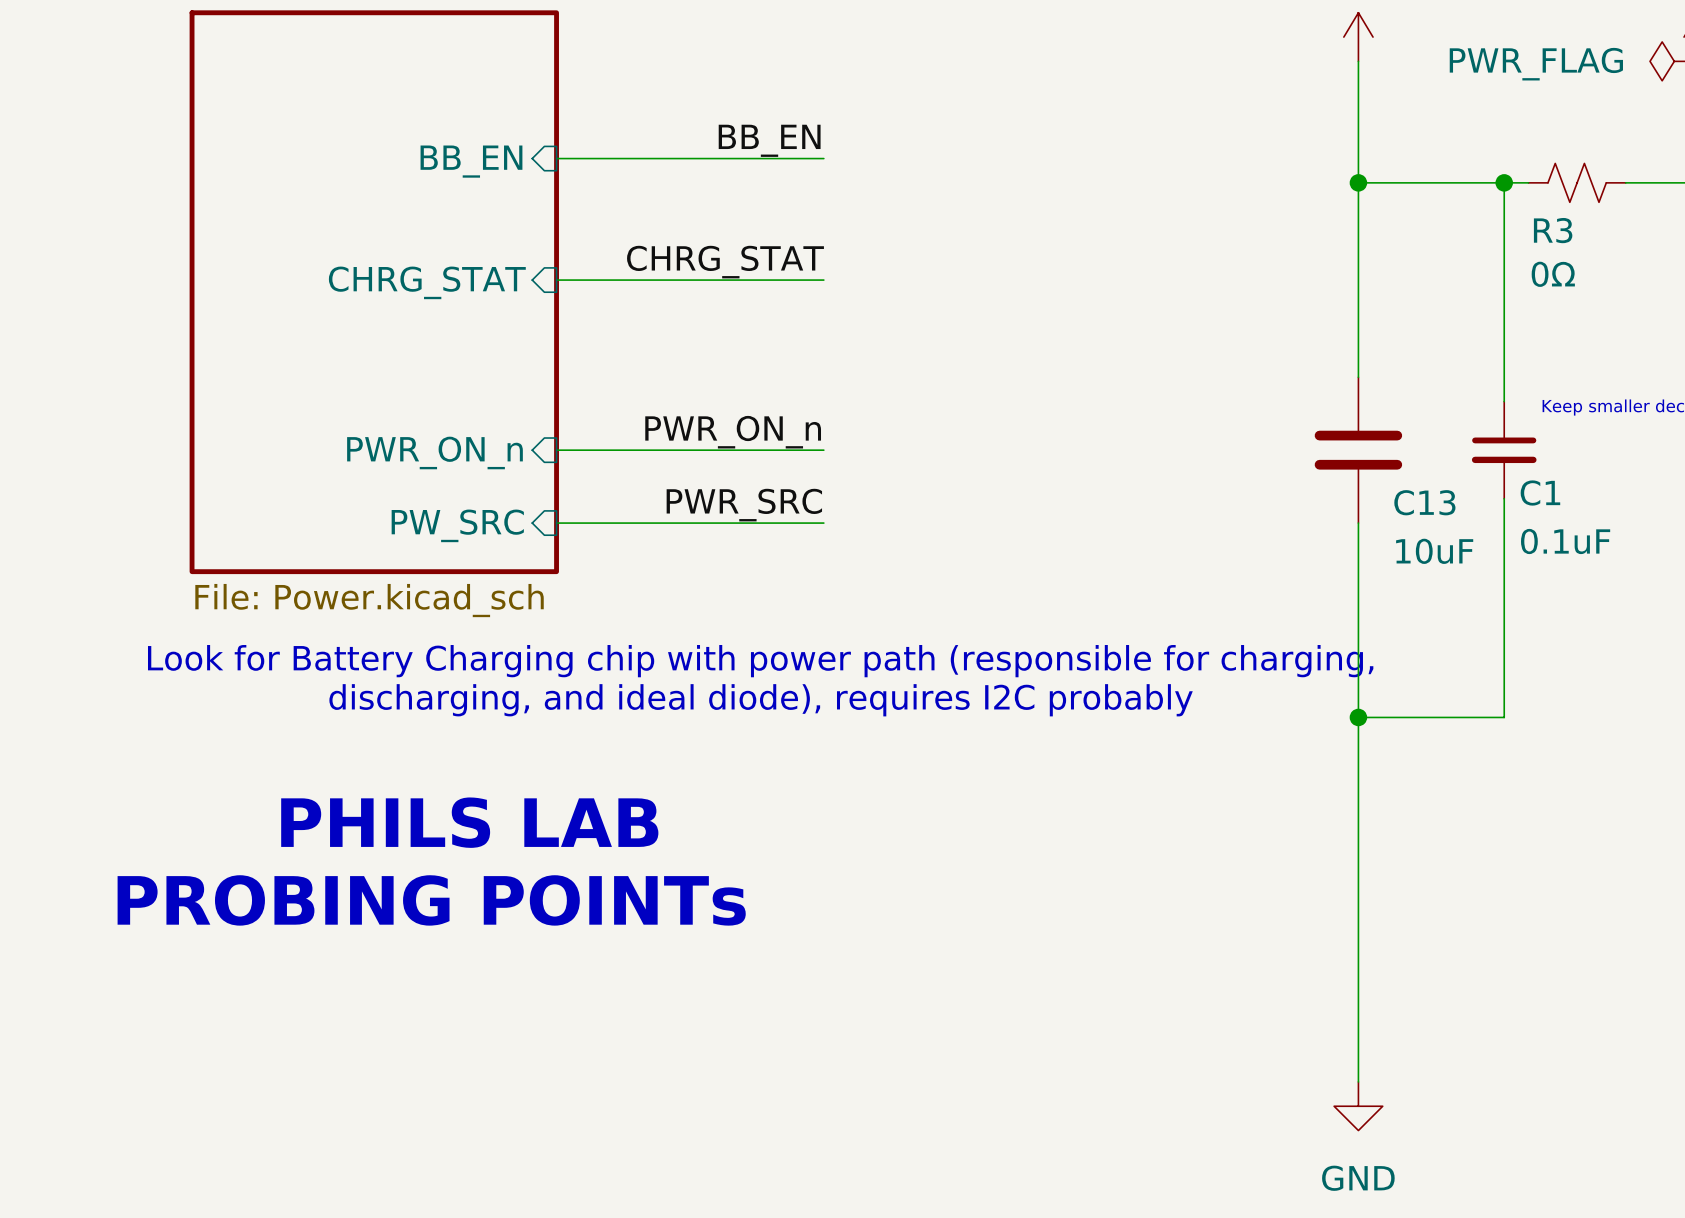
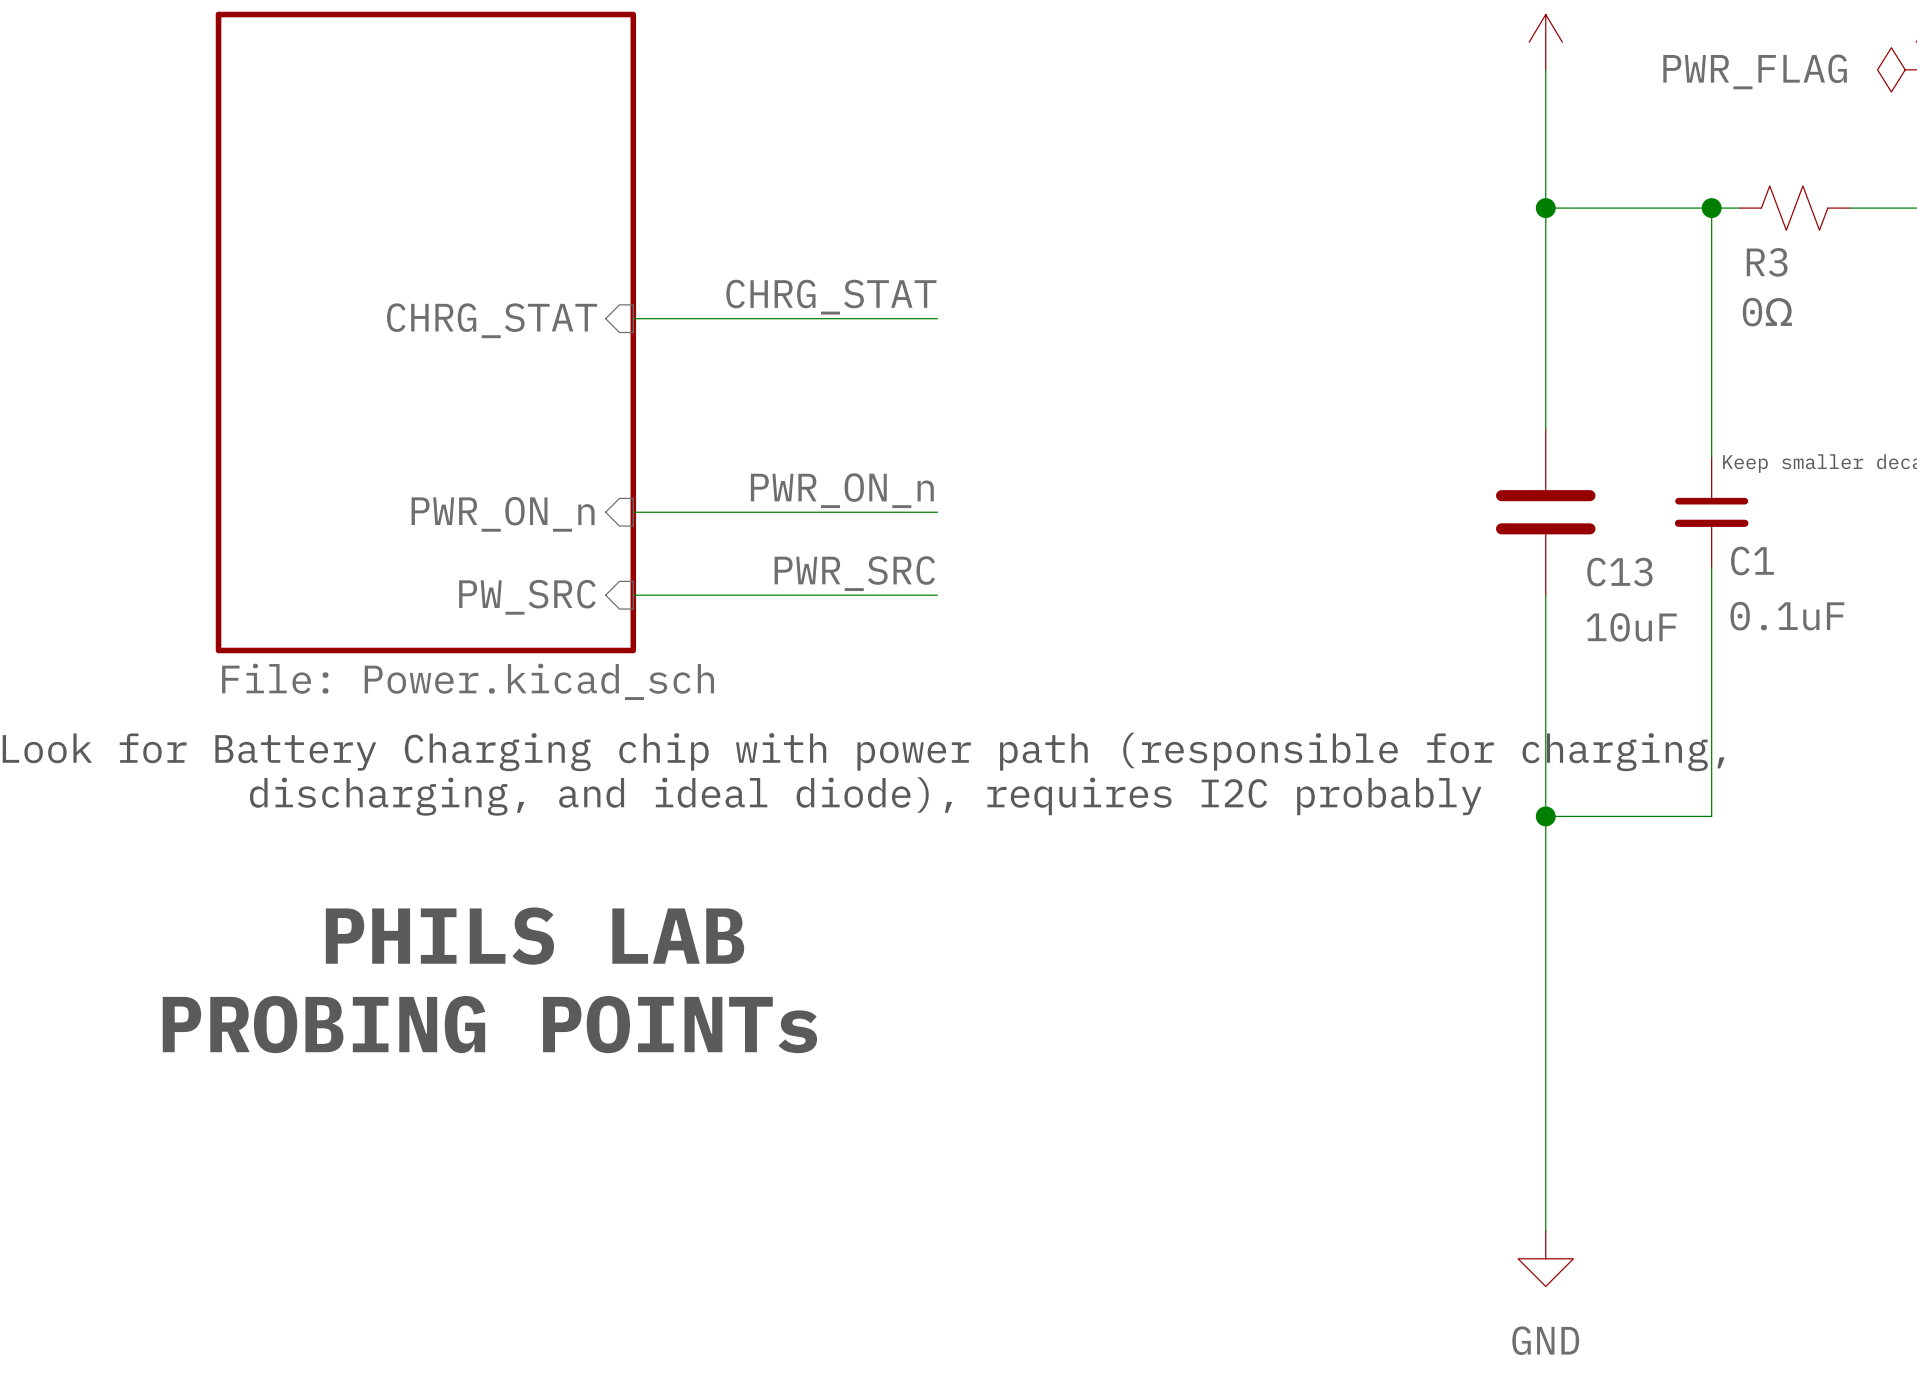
label: BB_EN (769, 140) -> none
wire: (556, 158) (823, 158) -> none
sheet pin: BB_EN (471, 161) -> none

